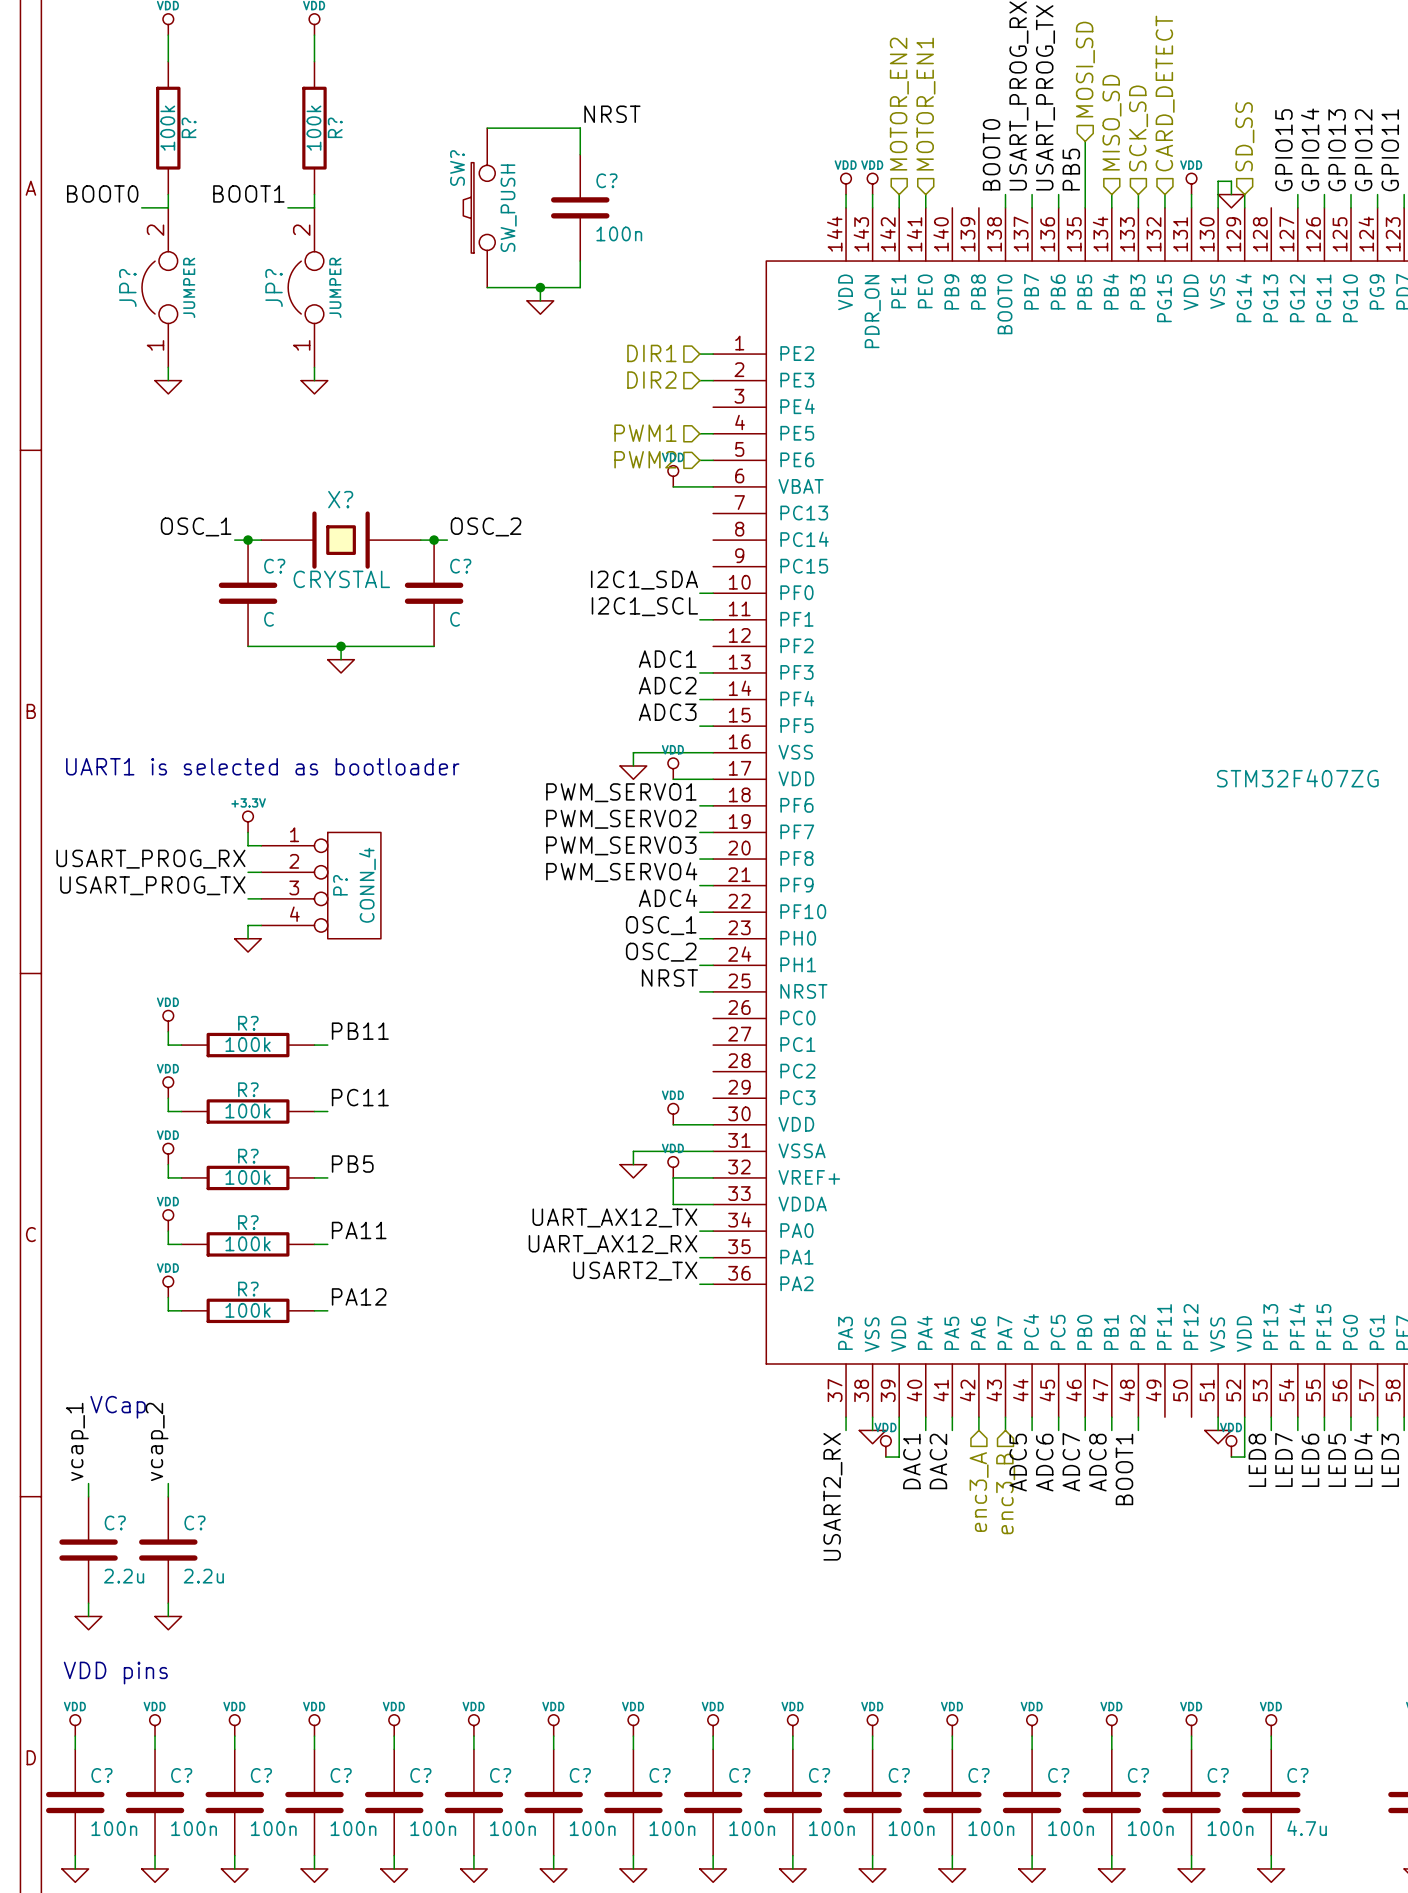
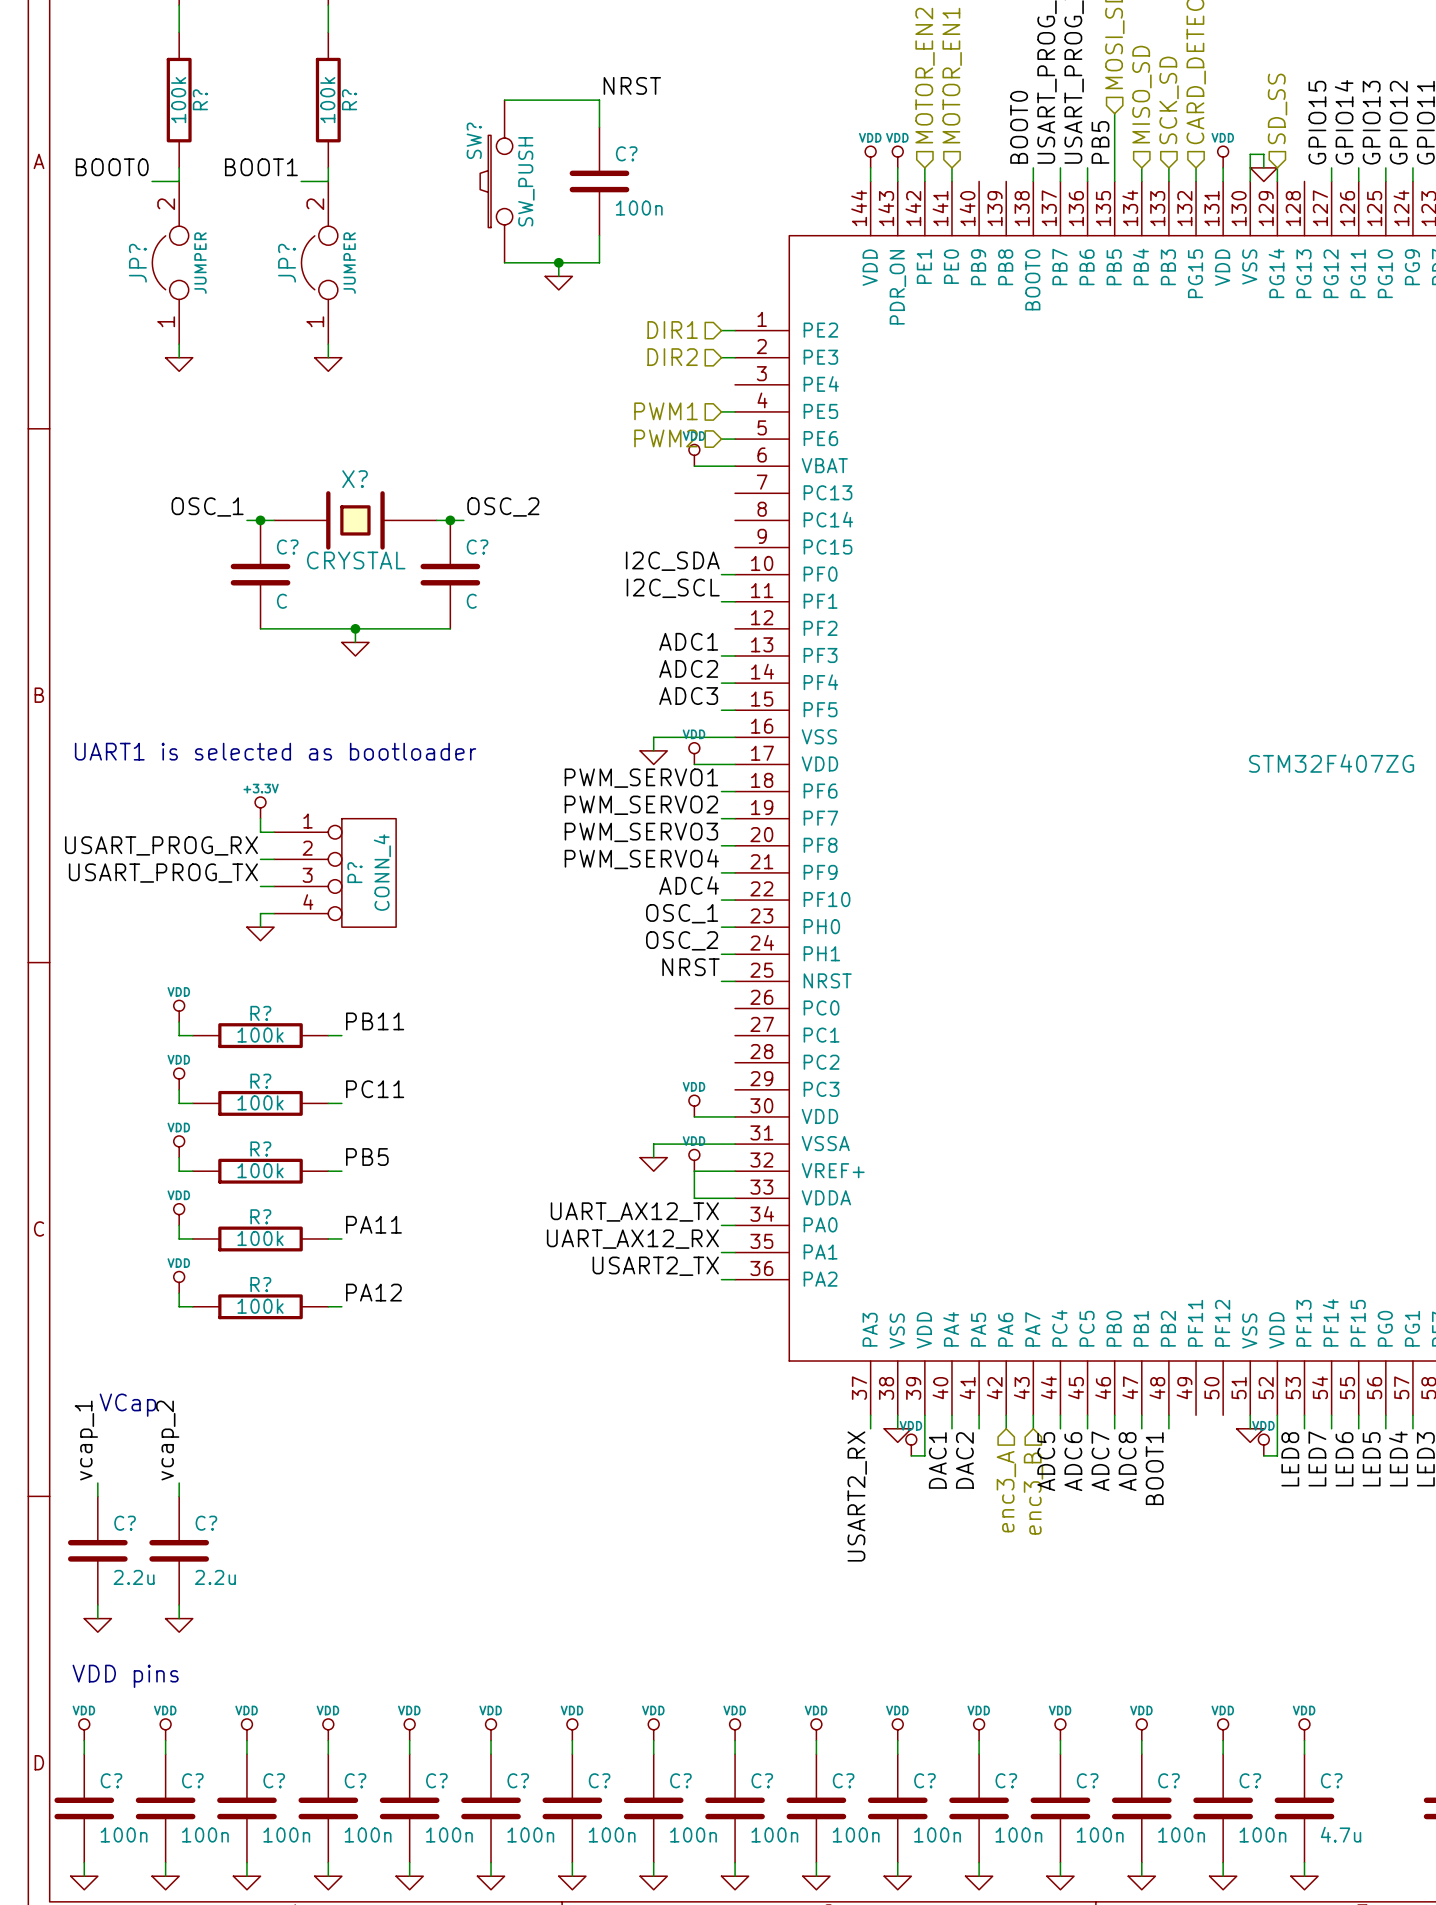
label: I2C1_SDA (644, 580) -> I2C_SDA (672, 561)
label: I2C1_SCL (644, 606) -> I2C_SCL (673, 588)

